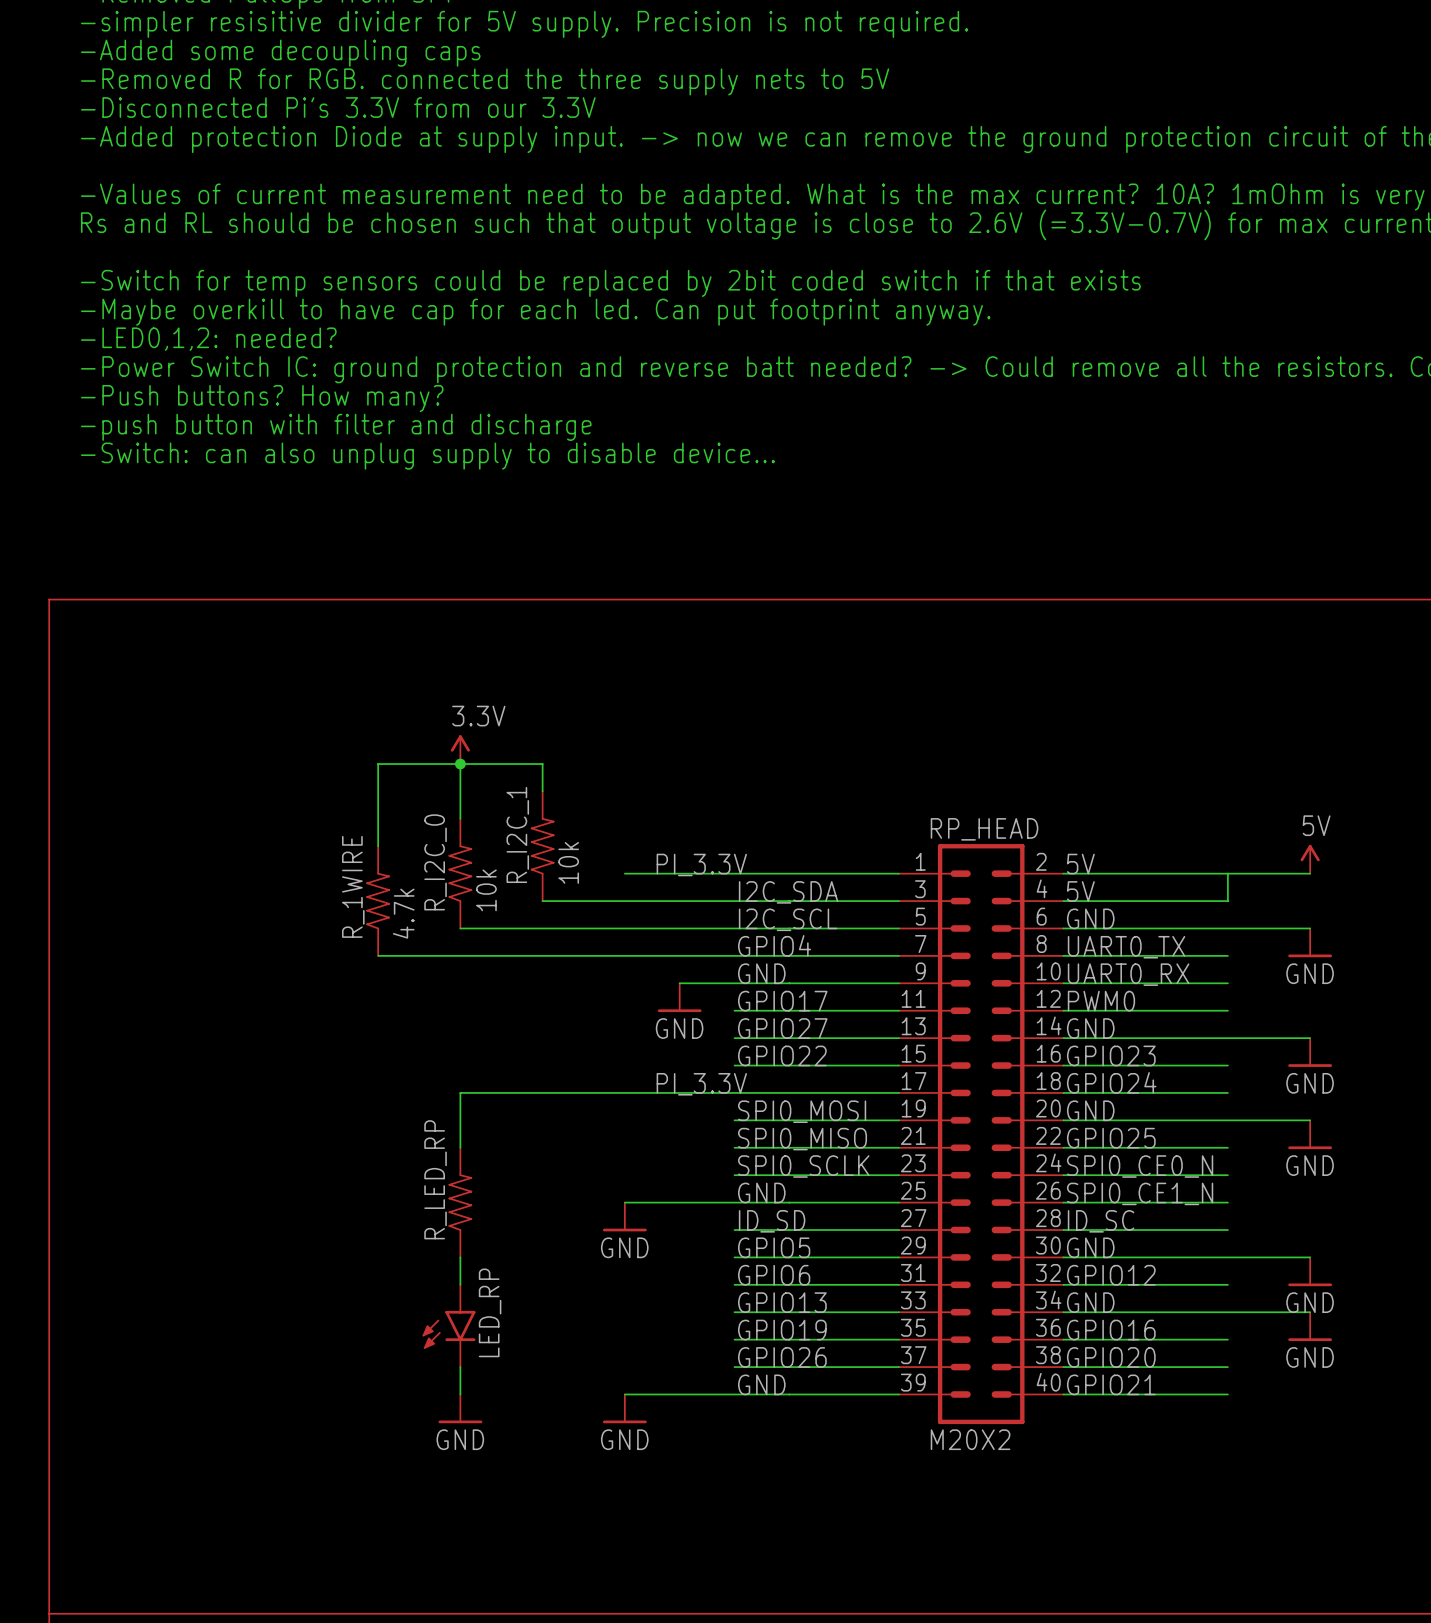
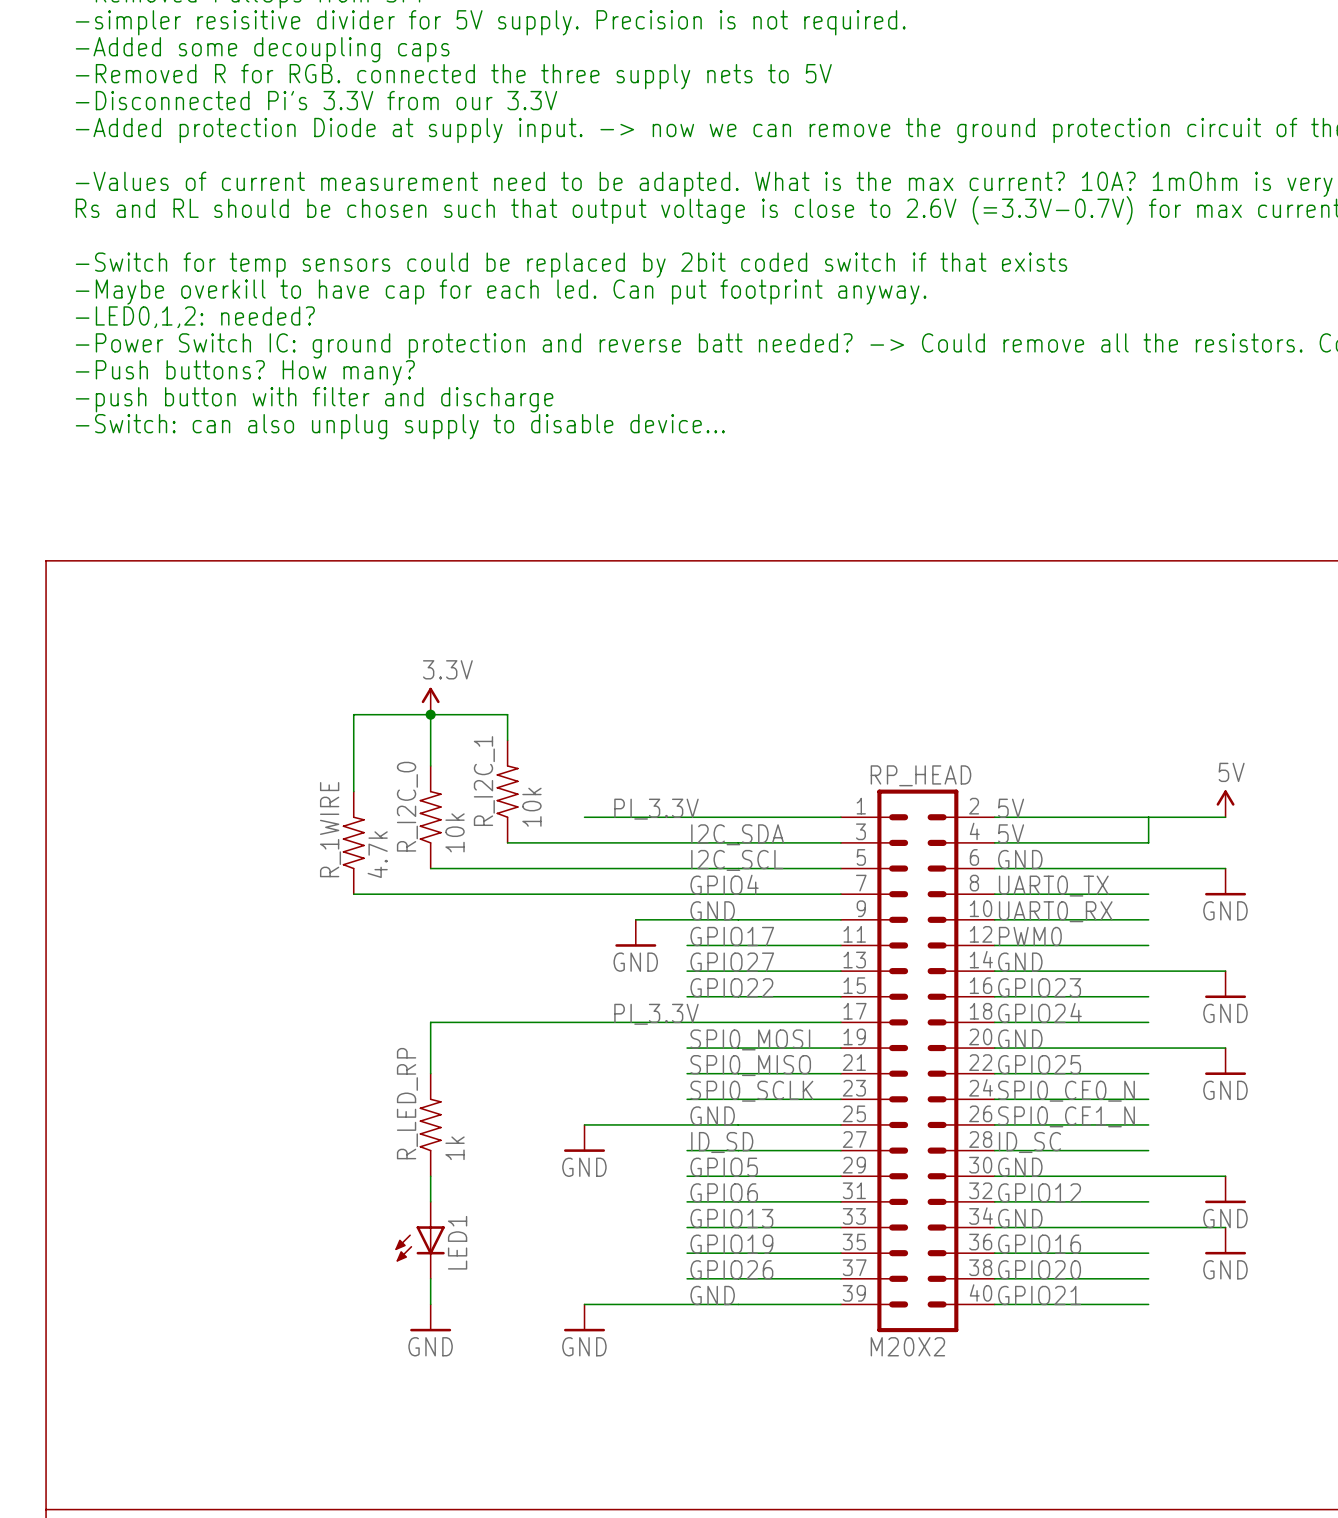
R_LED_RP value: none -> 1k (455, 1148)
LED_RP: (449, 1325) -> none
LED1: none -> (420, 1240)

